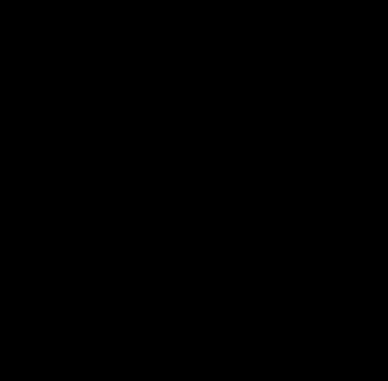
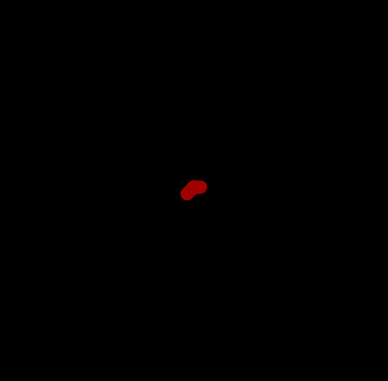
track: none -> (200, 187) (193, 187) (187, 193)

